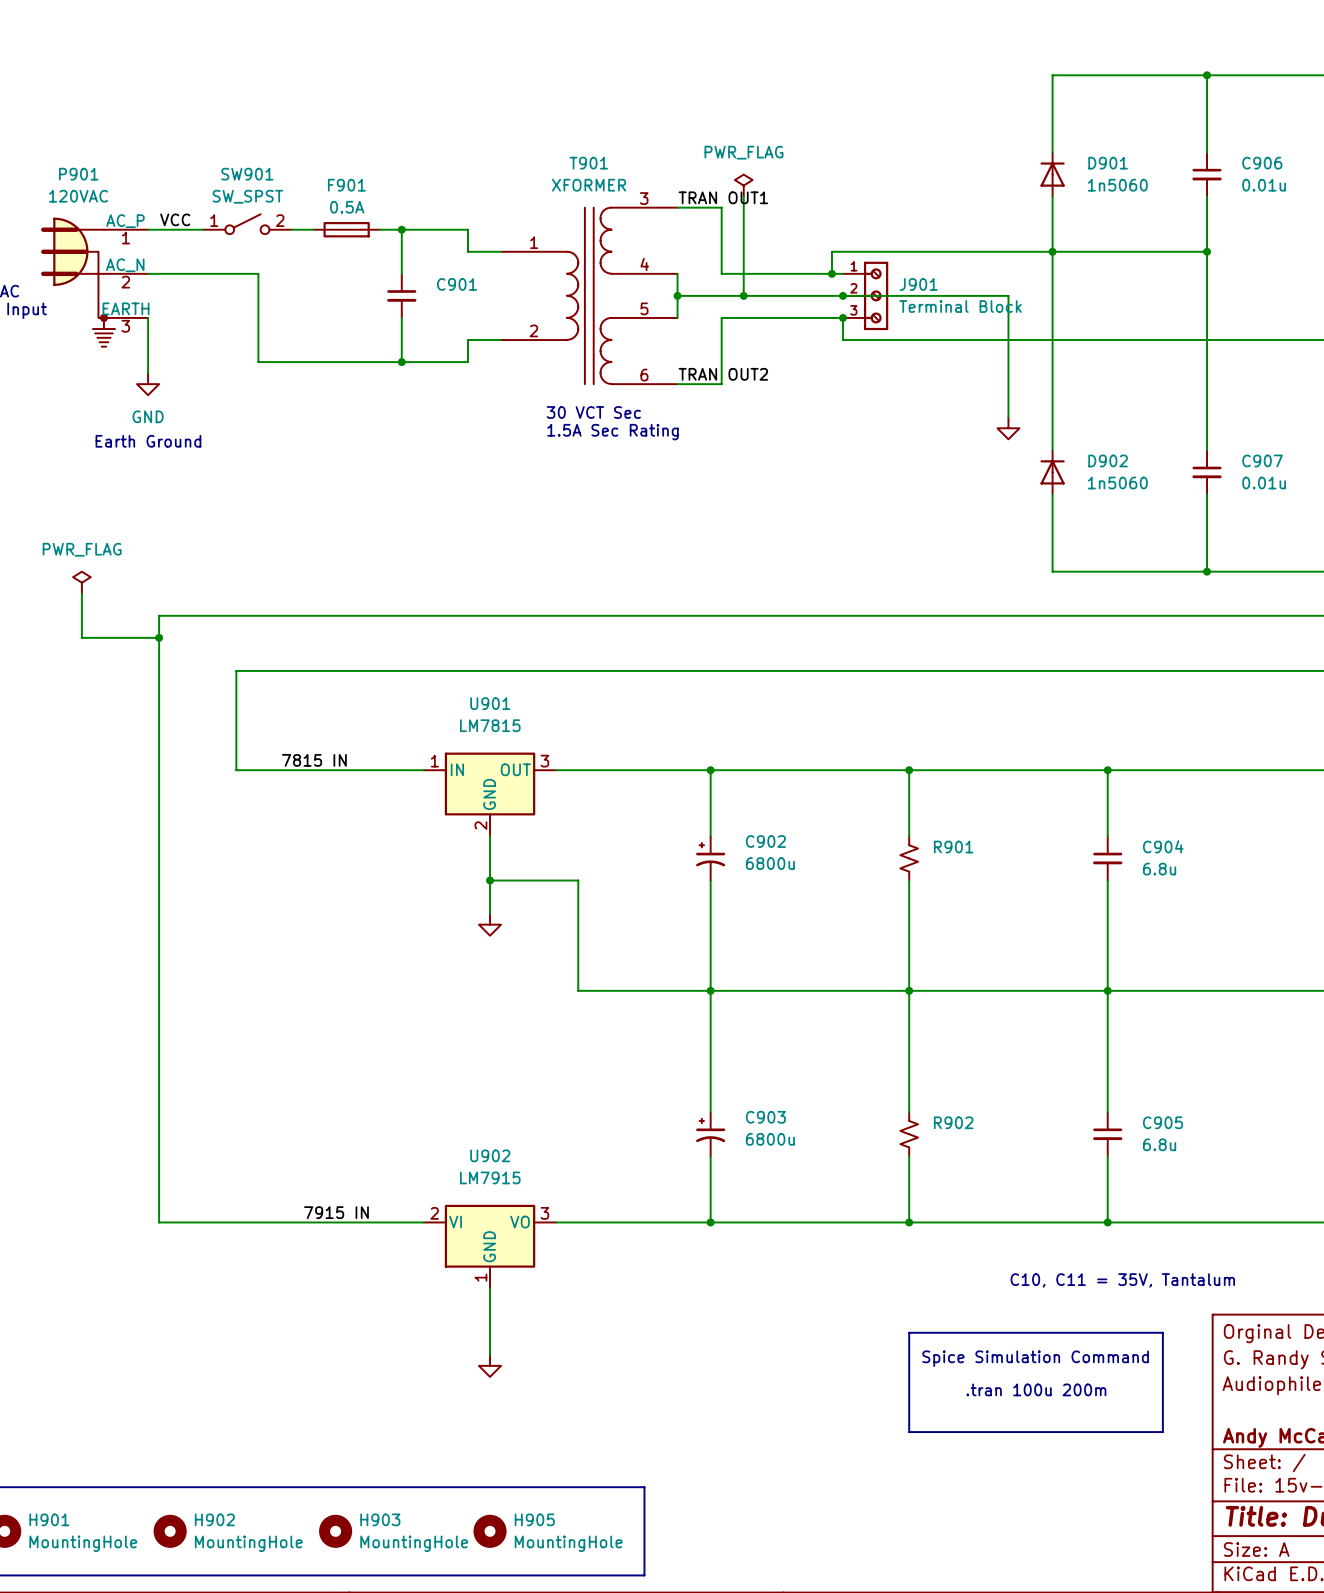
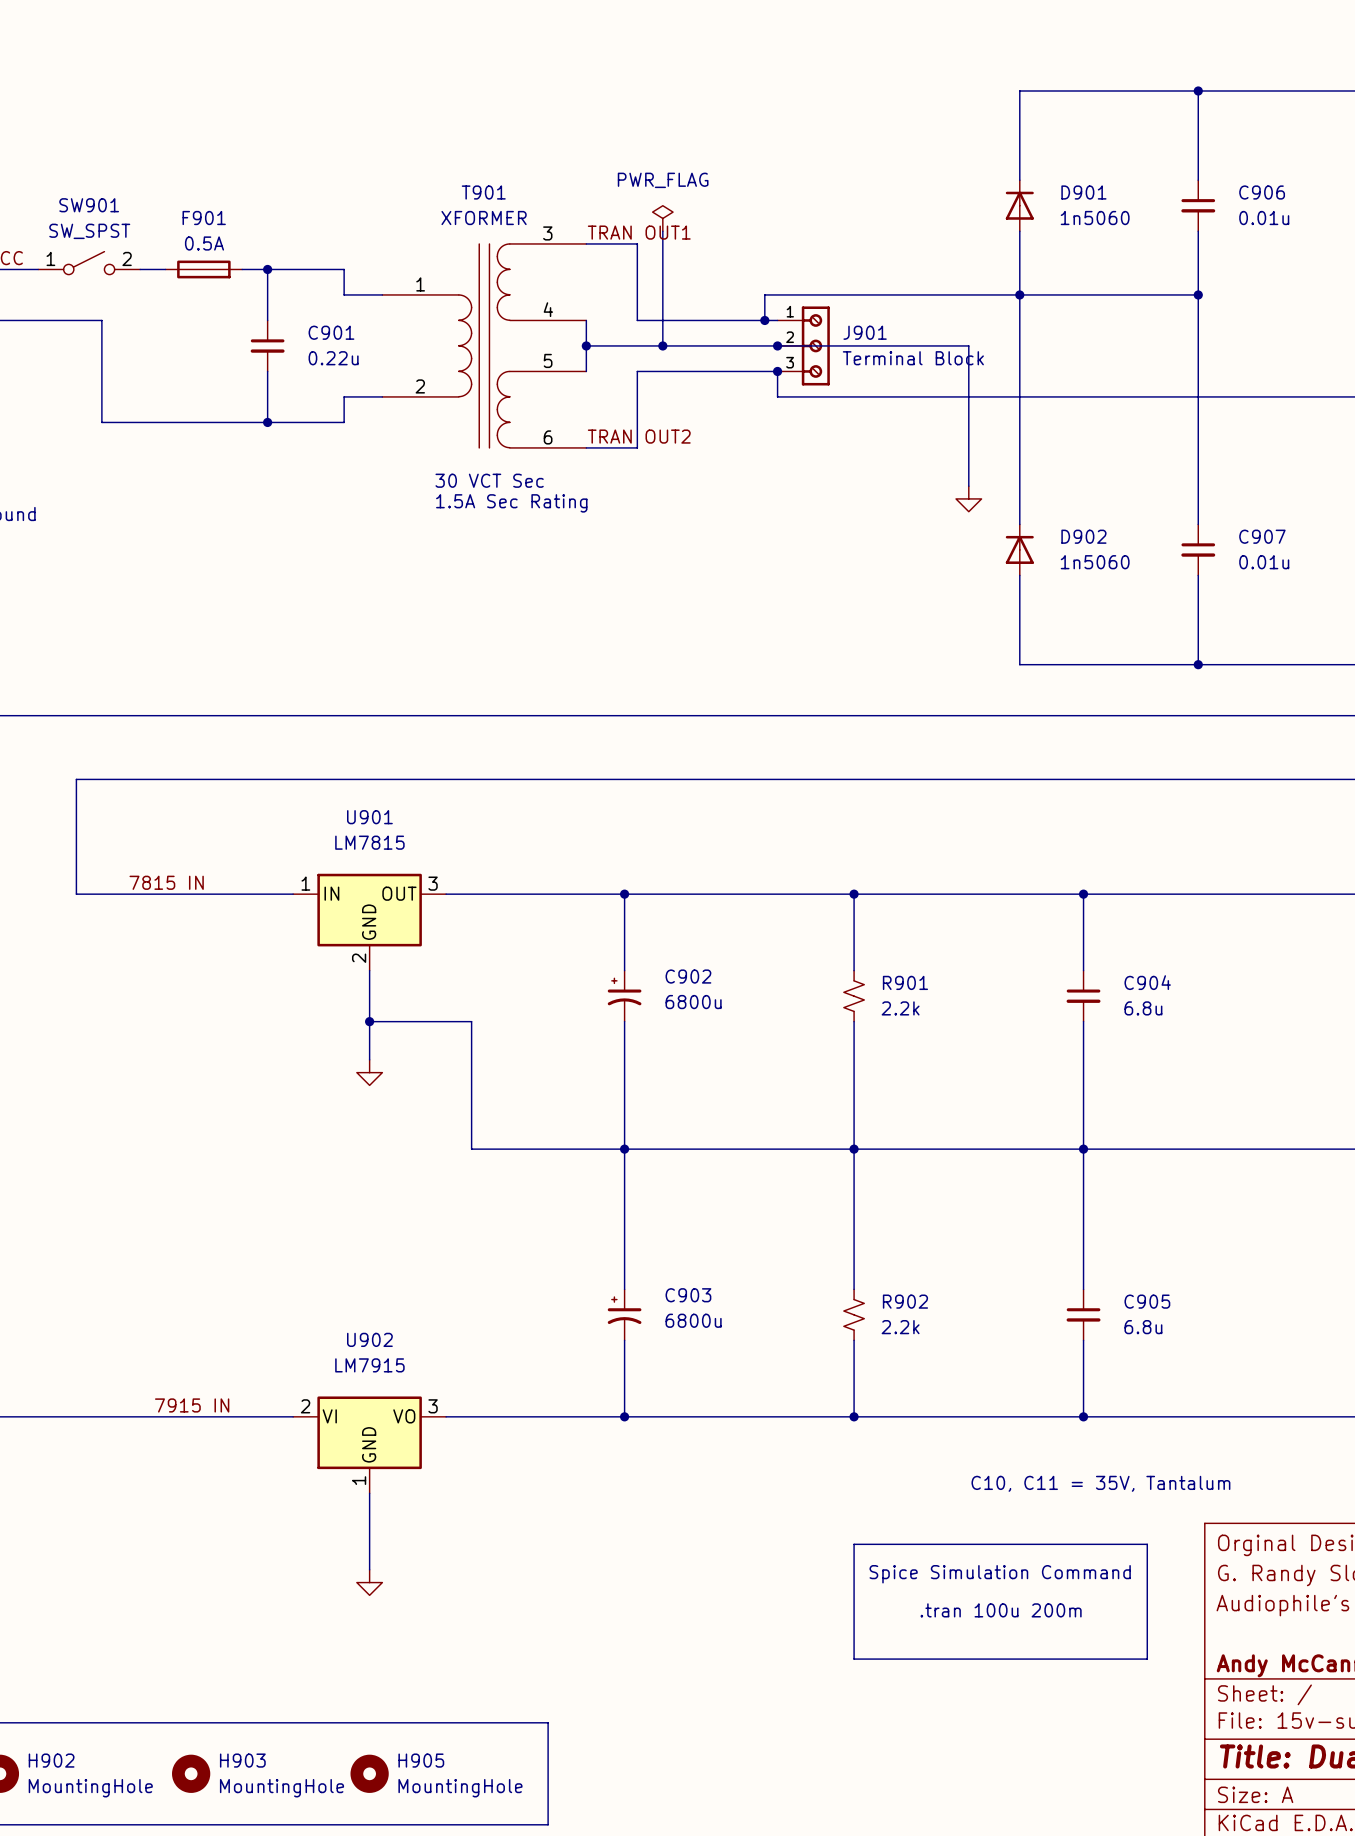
C901 value: none -> 0.22u (333, 358)
R901 value: none -> 2.2k (900, 1008)
R902 value: none -> 2.2k (900, 1327)

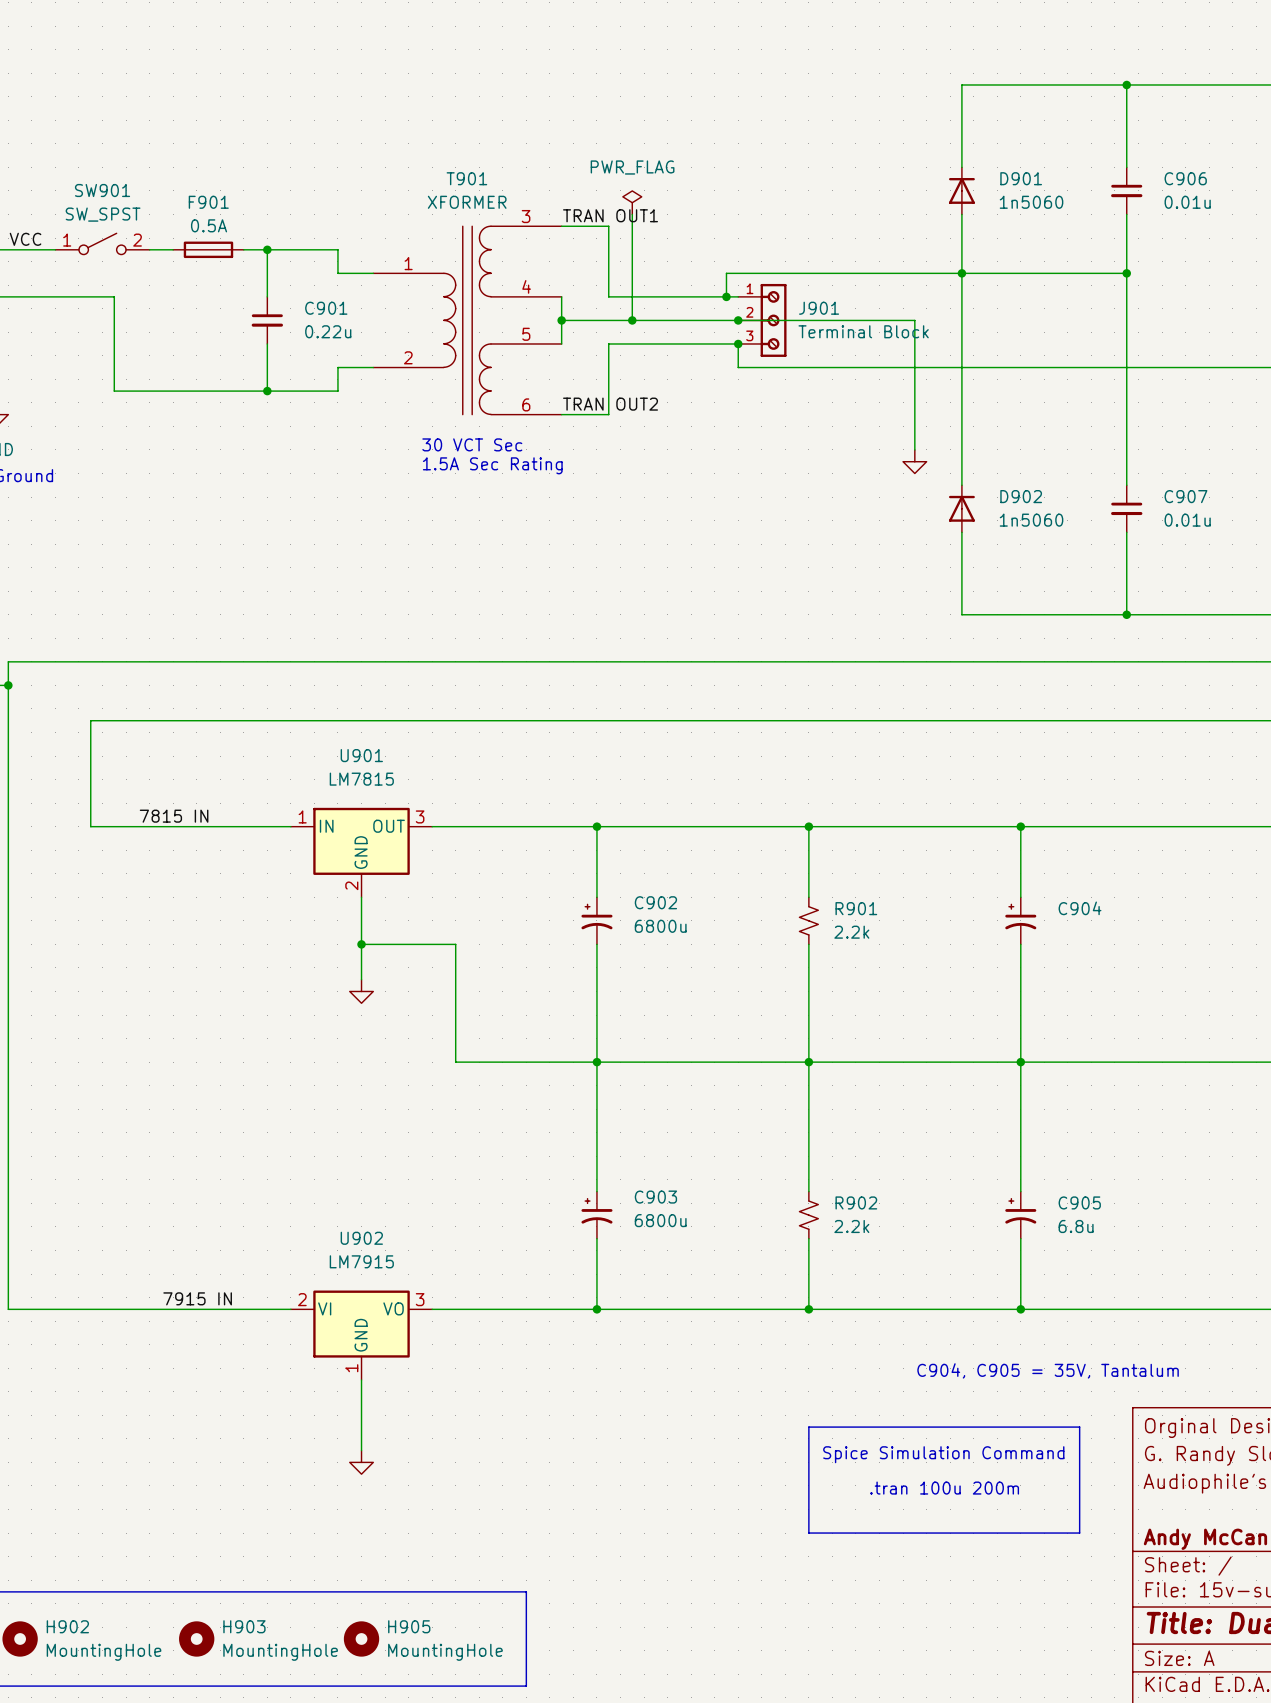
C904 symbol: [1066, 970, 1101, 1022] -> [1005, 897, 1037, 945]
C904 value: 6.8u (1143, 1008) -> none
C905 symbol: [1066, 1289, 1101, 1341] -> [1005, 1191, 1037, 1239]
text: C10, C11 = 35V, Tantalum (1100, 1483) -> C904, C905 = 35V, Tantalum (1048, 1370)

